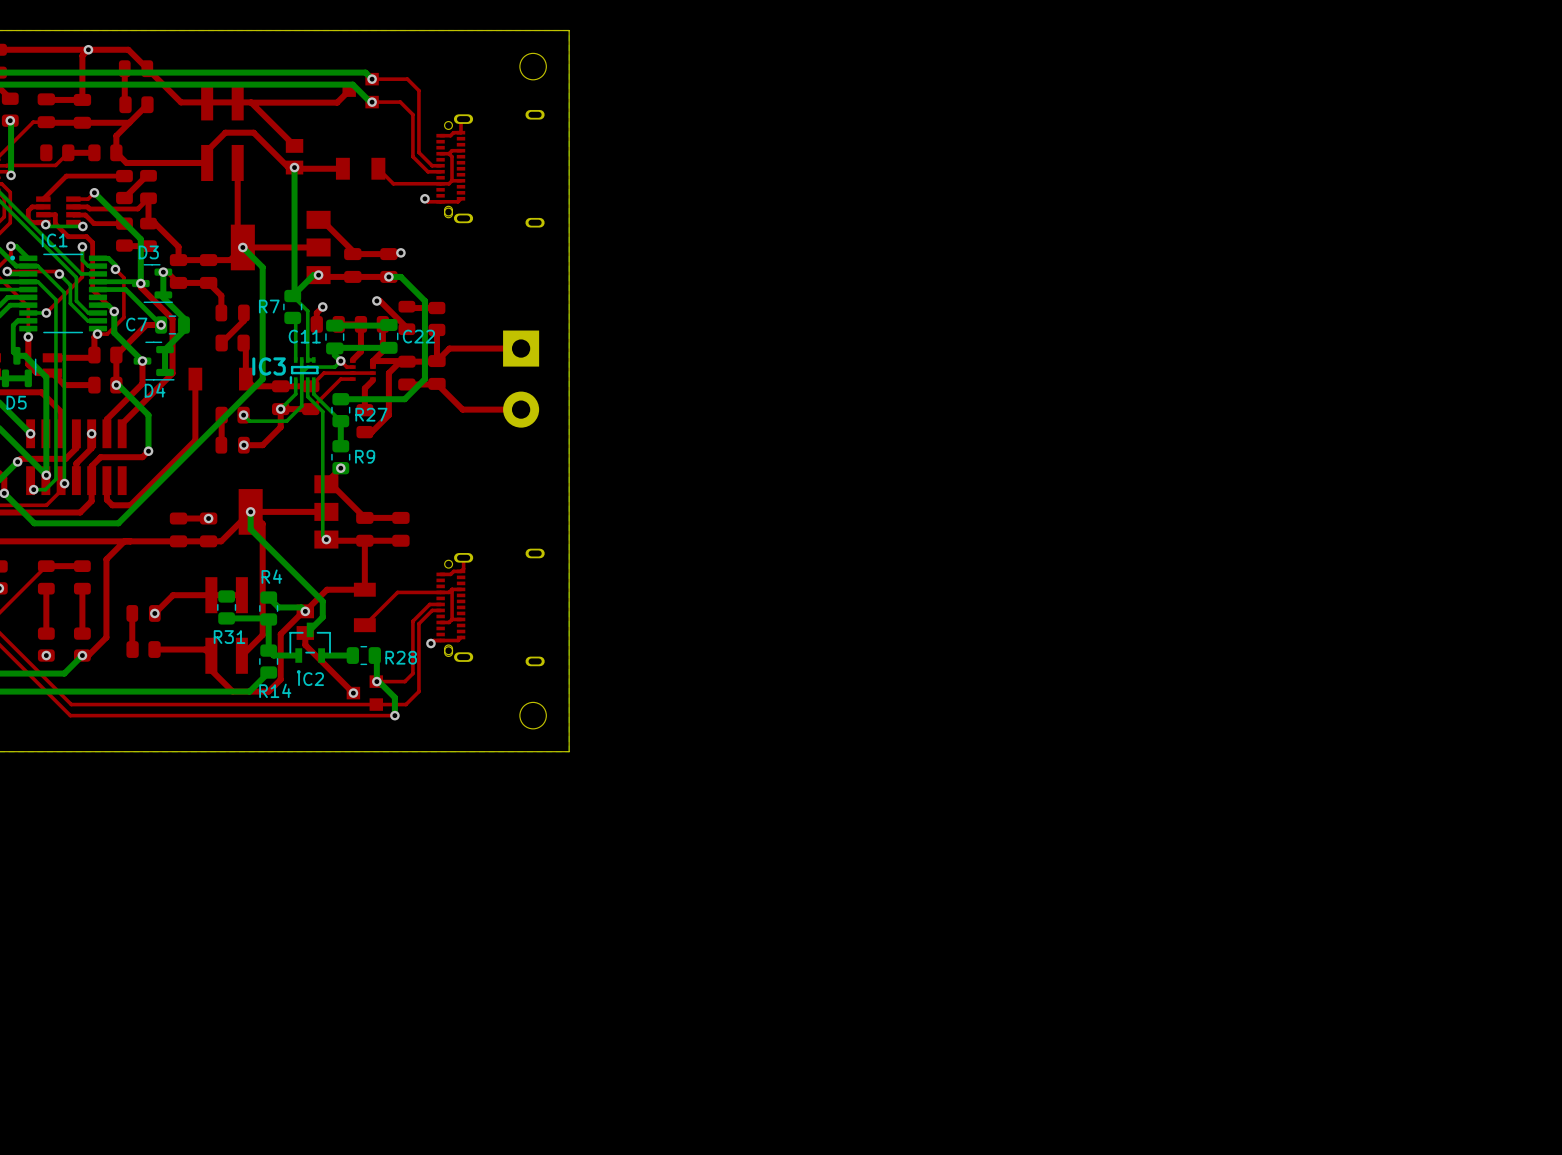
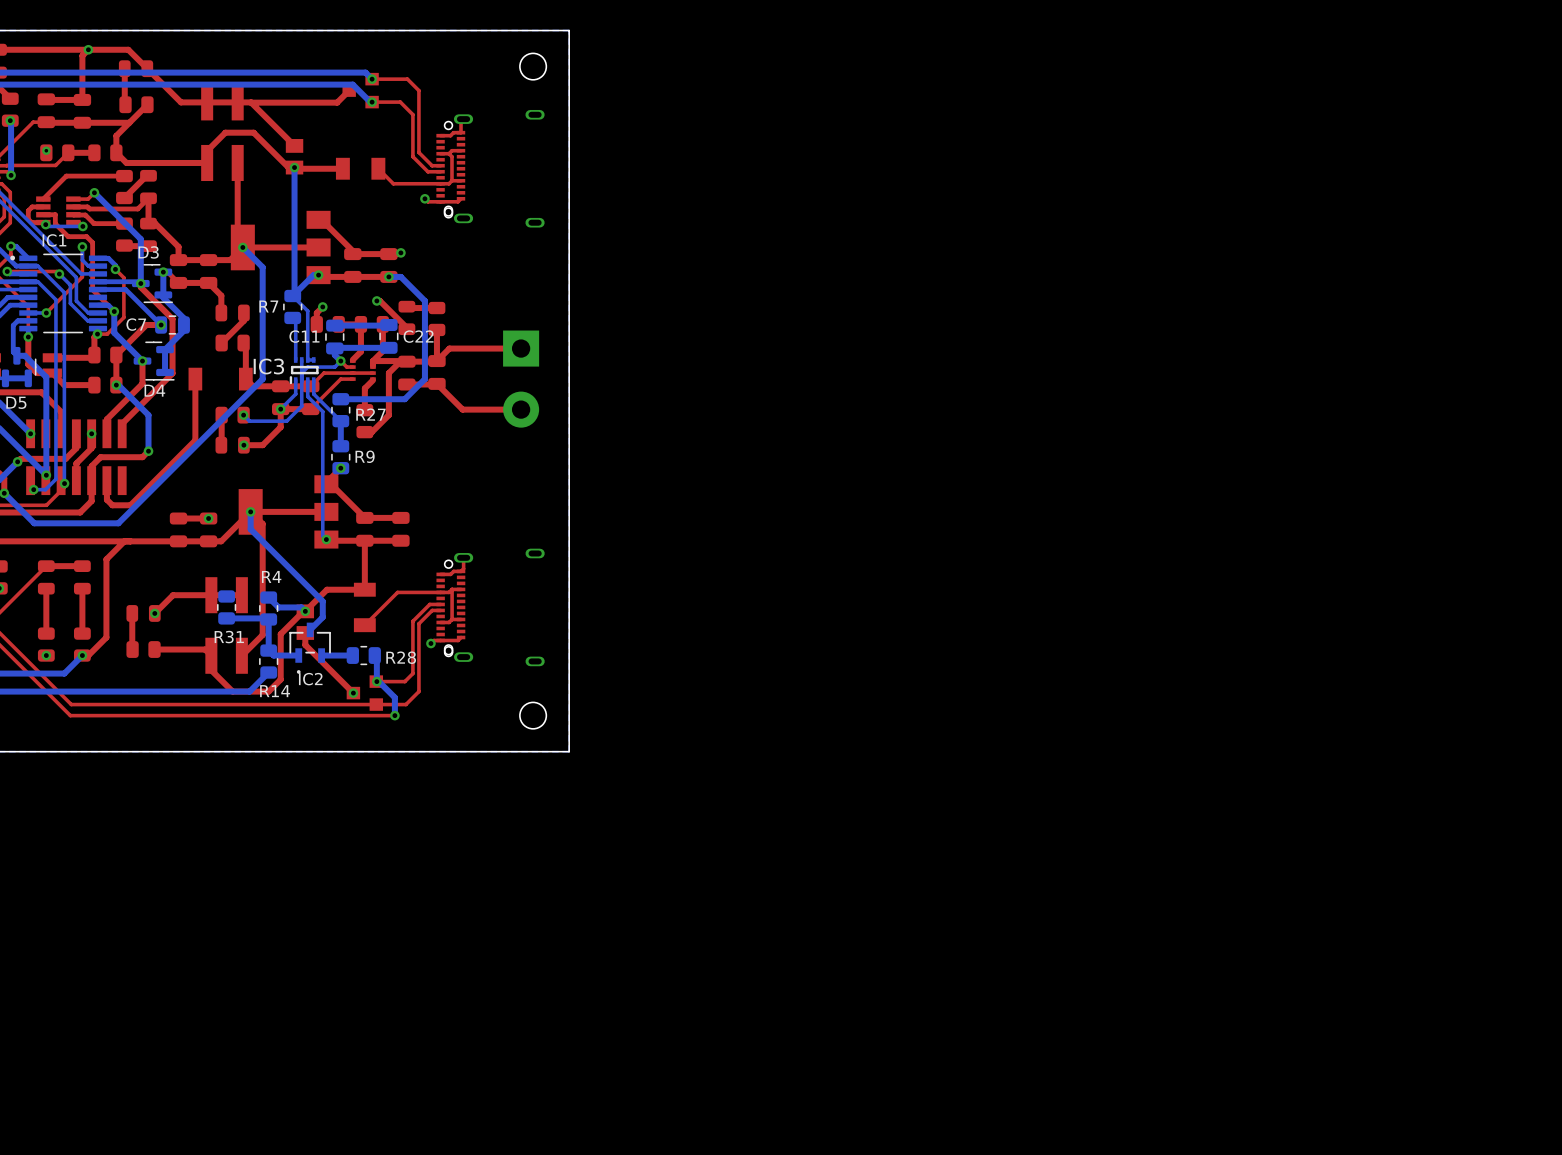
via: none -> (46, 150)

